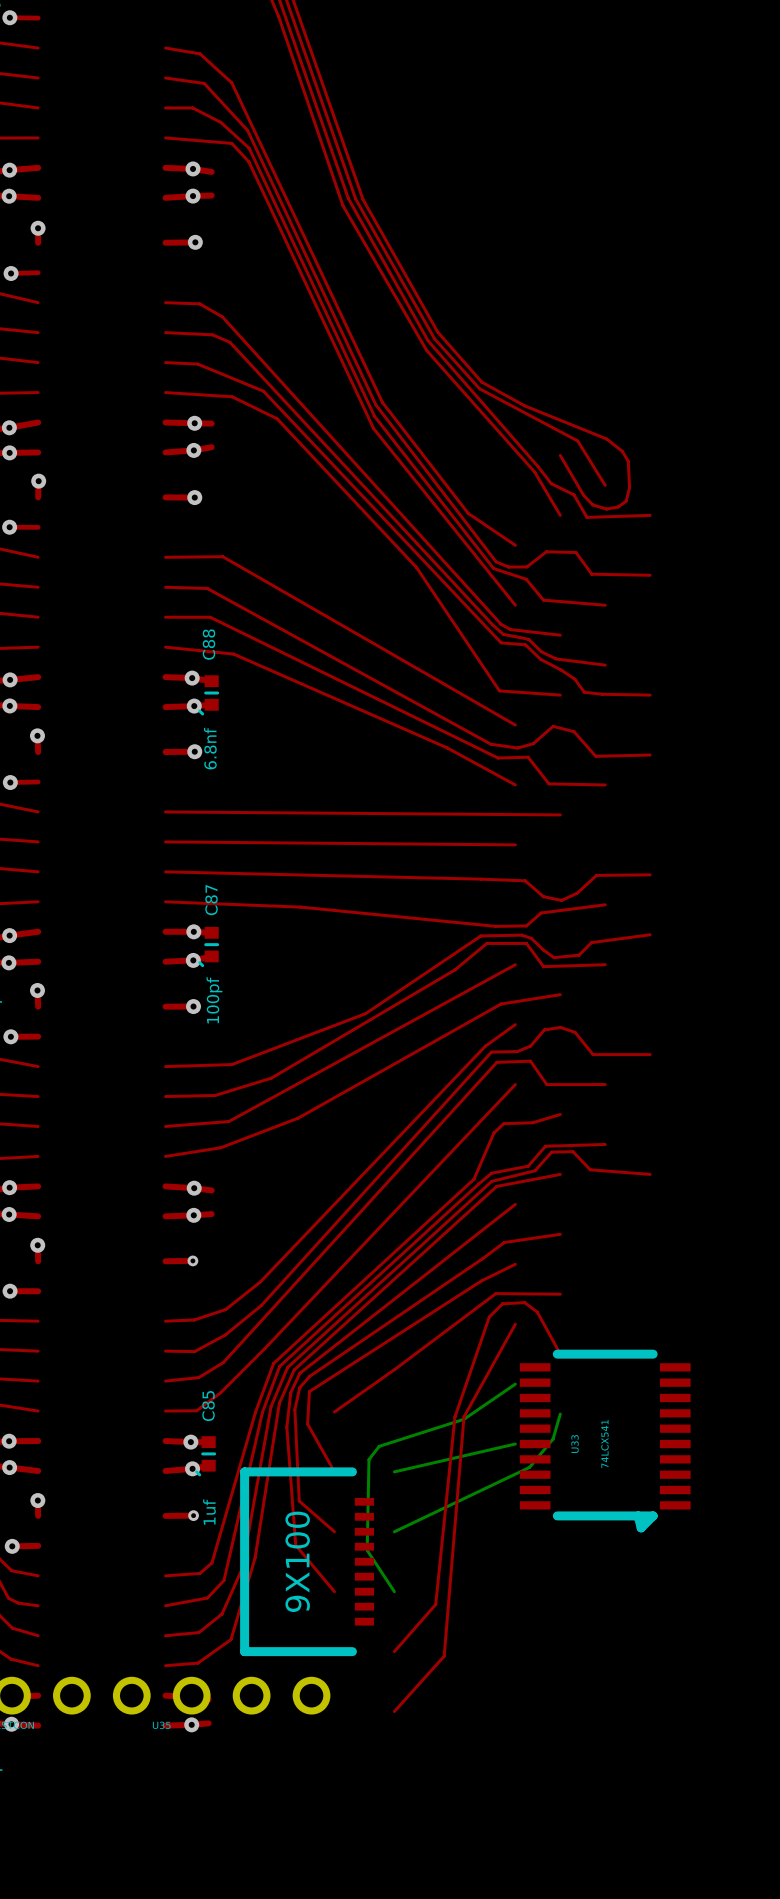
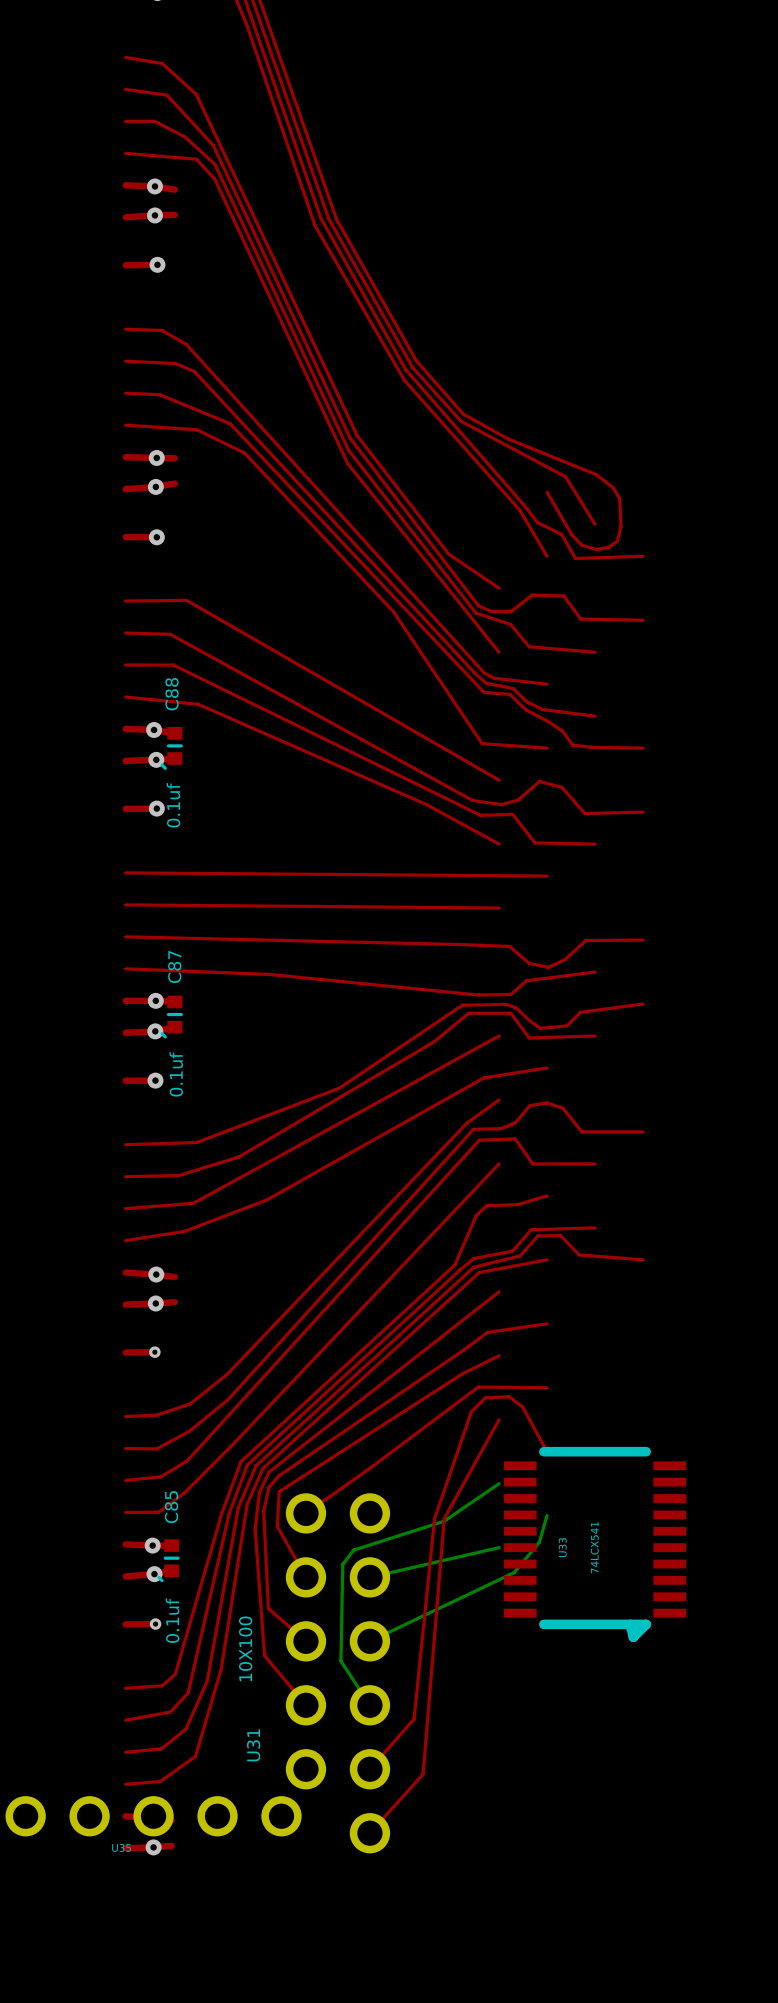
C88 value: 6.8nf (210, 748) -> 0.1uf (173, 805)
C87 value: 100pf (214, 1000) -> 0.1uf (176, 1074)
C85 value: 1uf (209, 1512) -> 0.1uf (172, 1620)
part: 9X100 (307, 1561) -> none
U31: none -> 10X100 (337, 1673)

